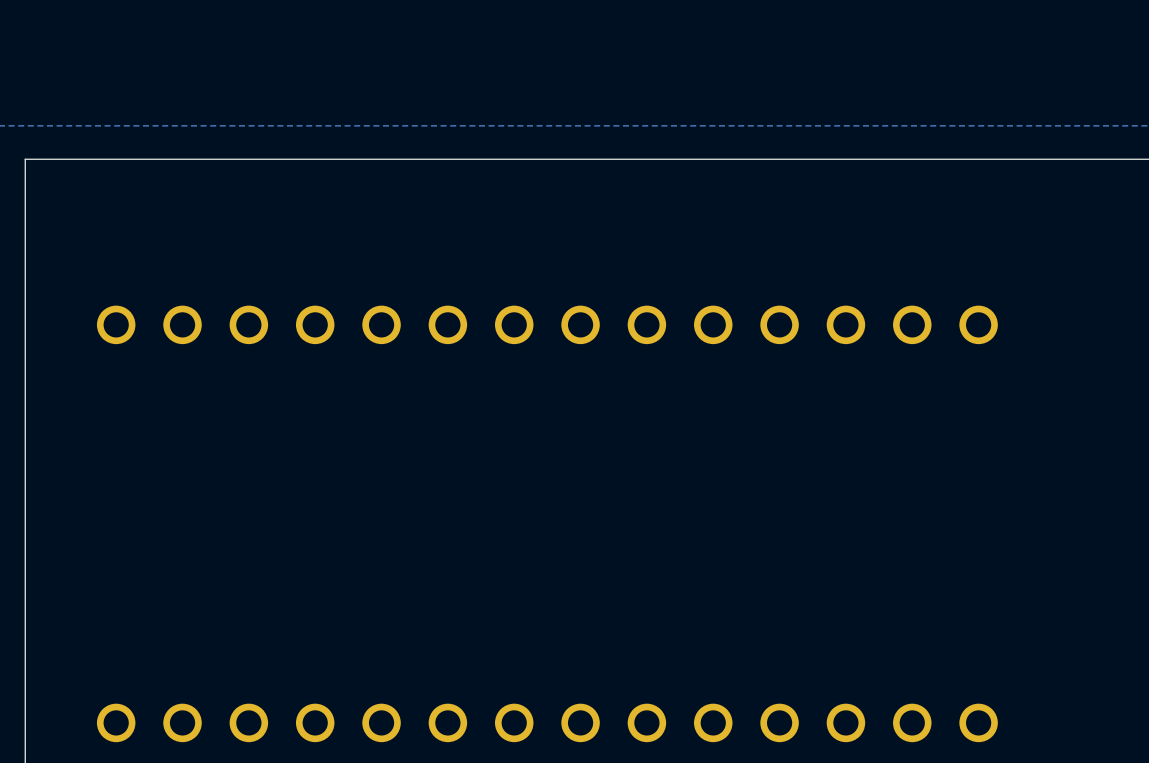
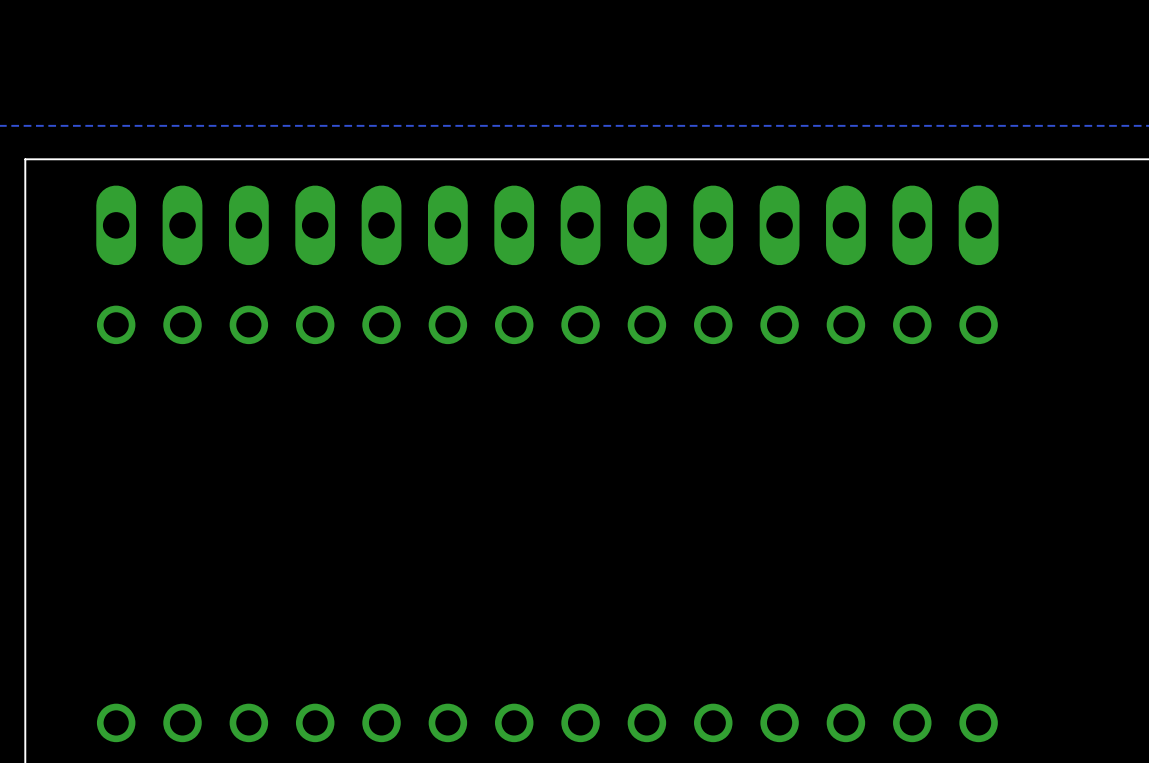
part: none -> (547, 225)

